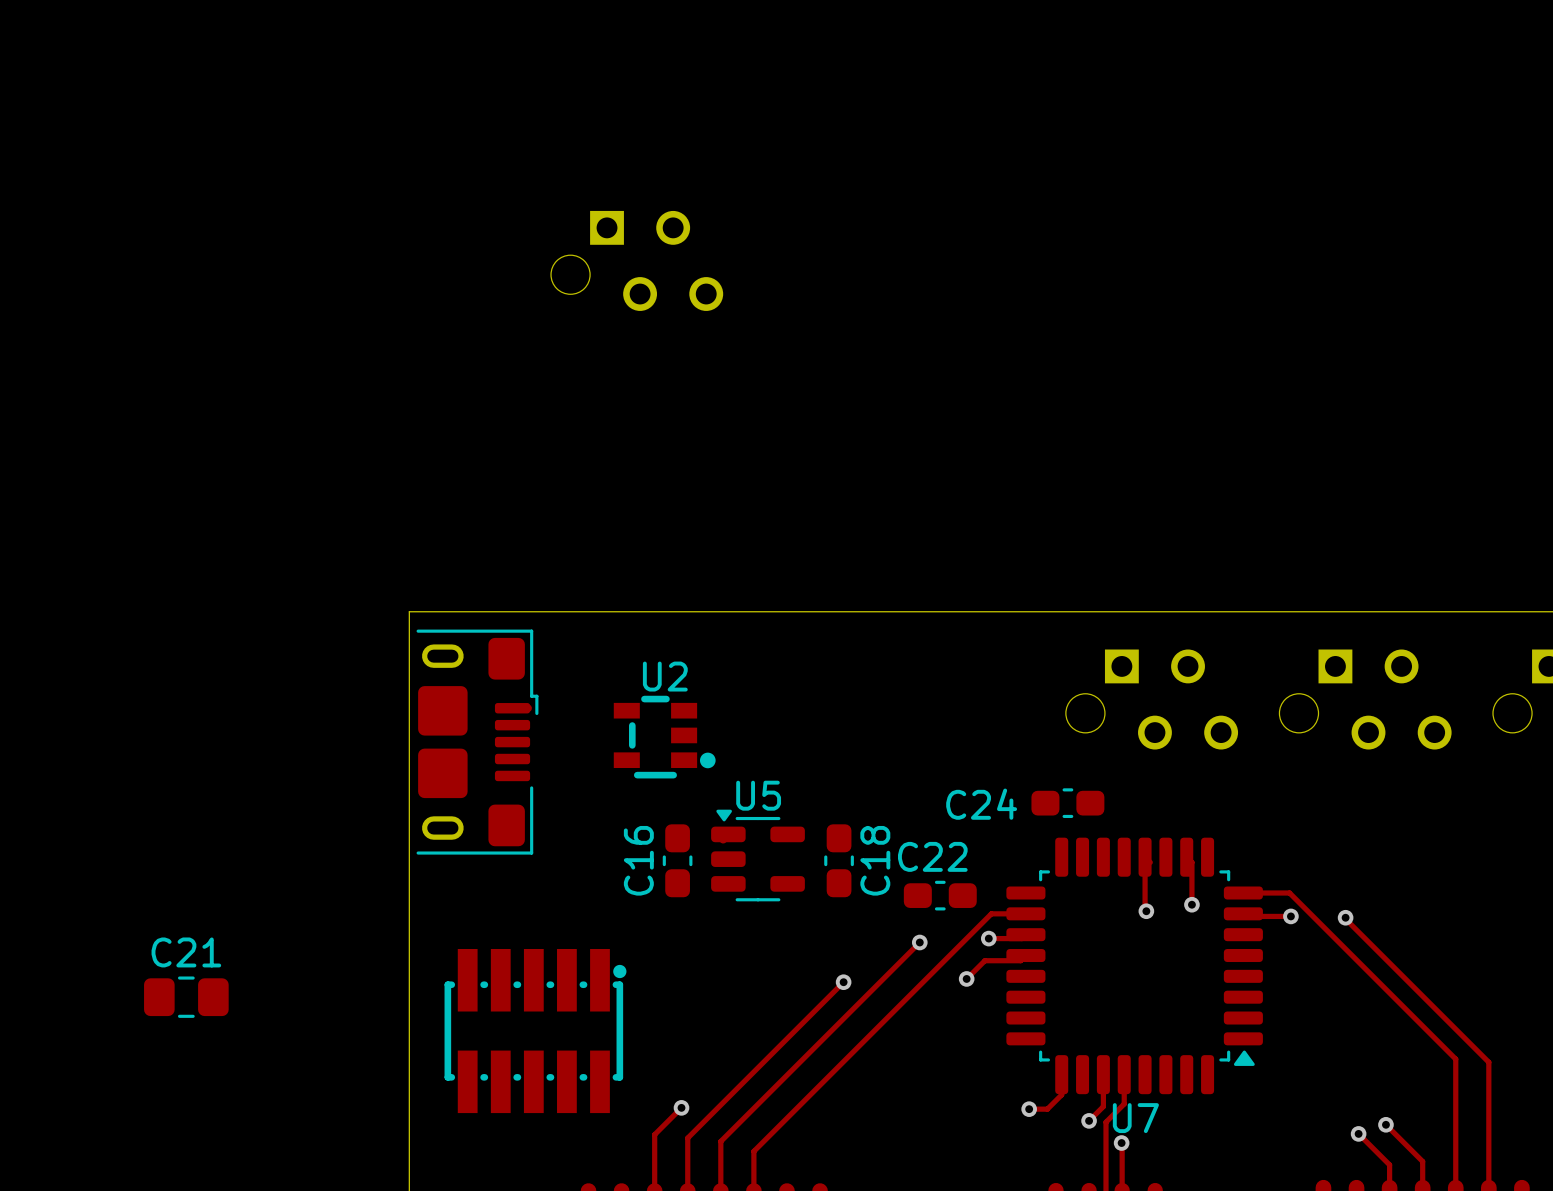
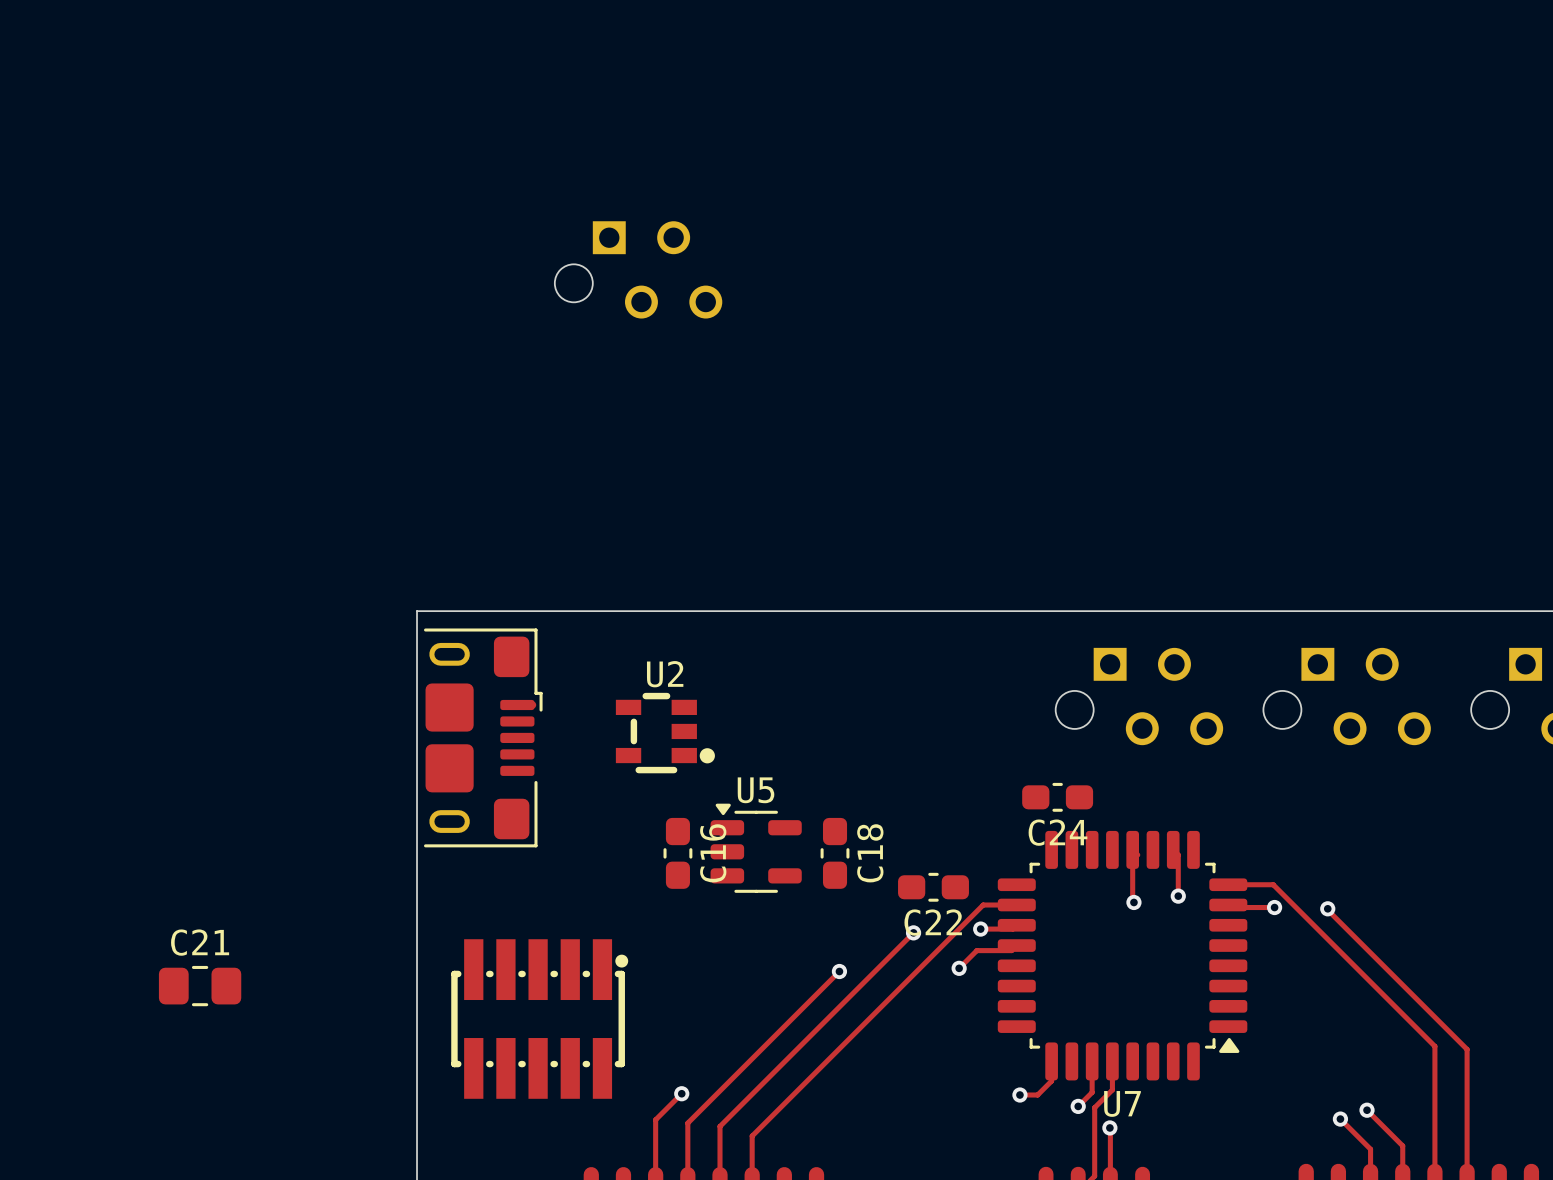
C24 name position: C24 (981, 804) -> C24 (1057, 832)
C22 name position: C22 (932, 856) -> C22 (933, 922)
C16 name position: C16 (638, 860) -> C16 (713, 853)

